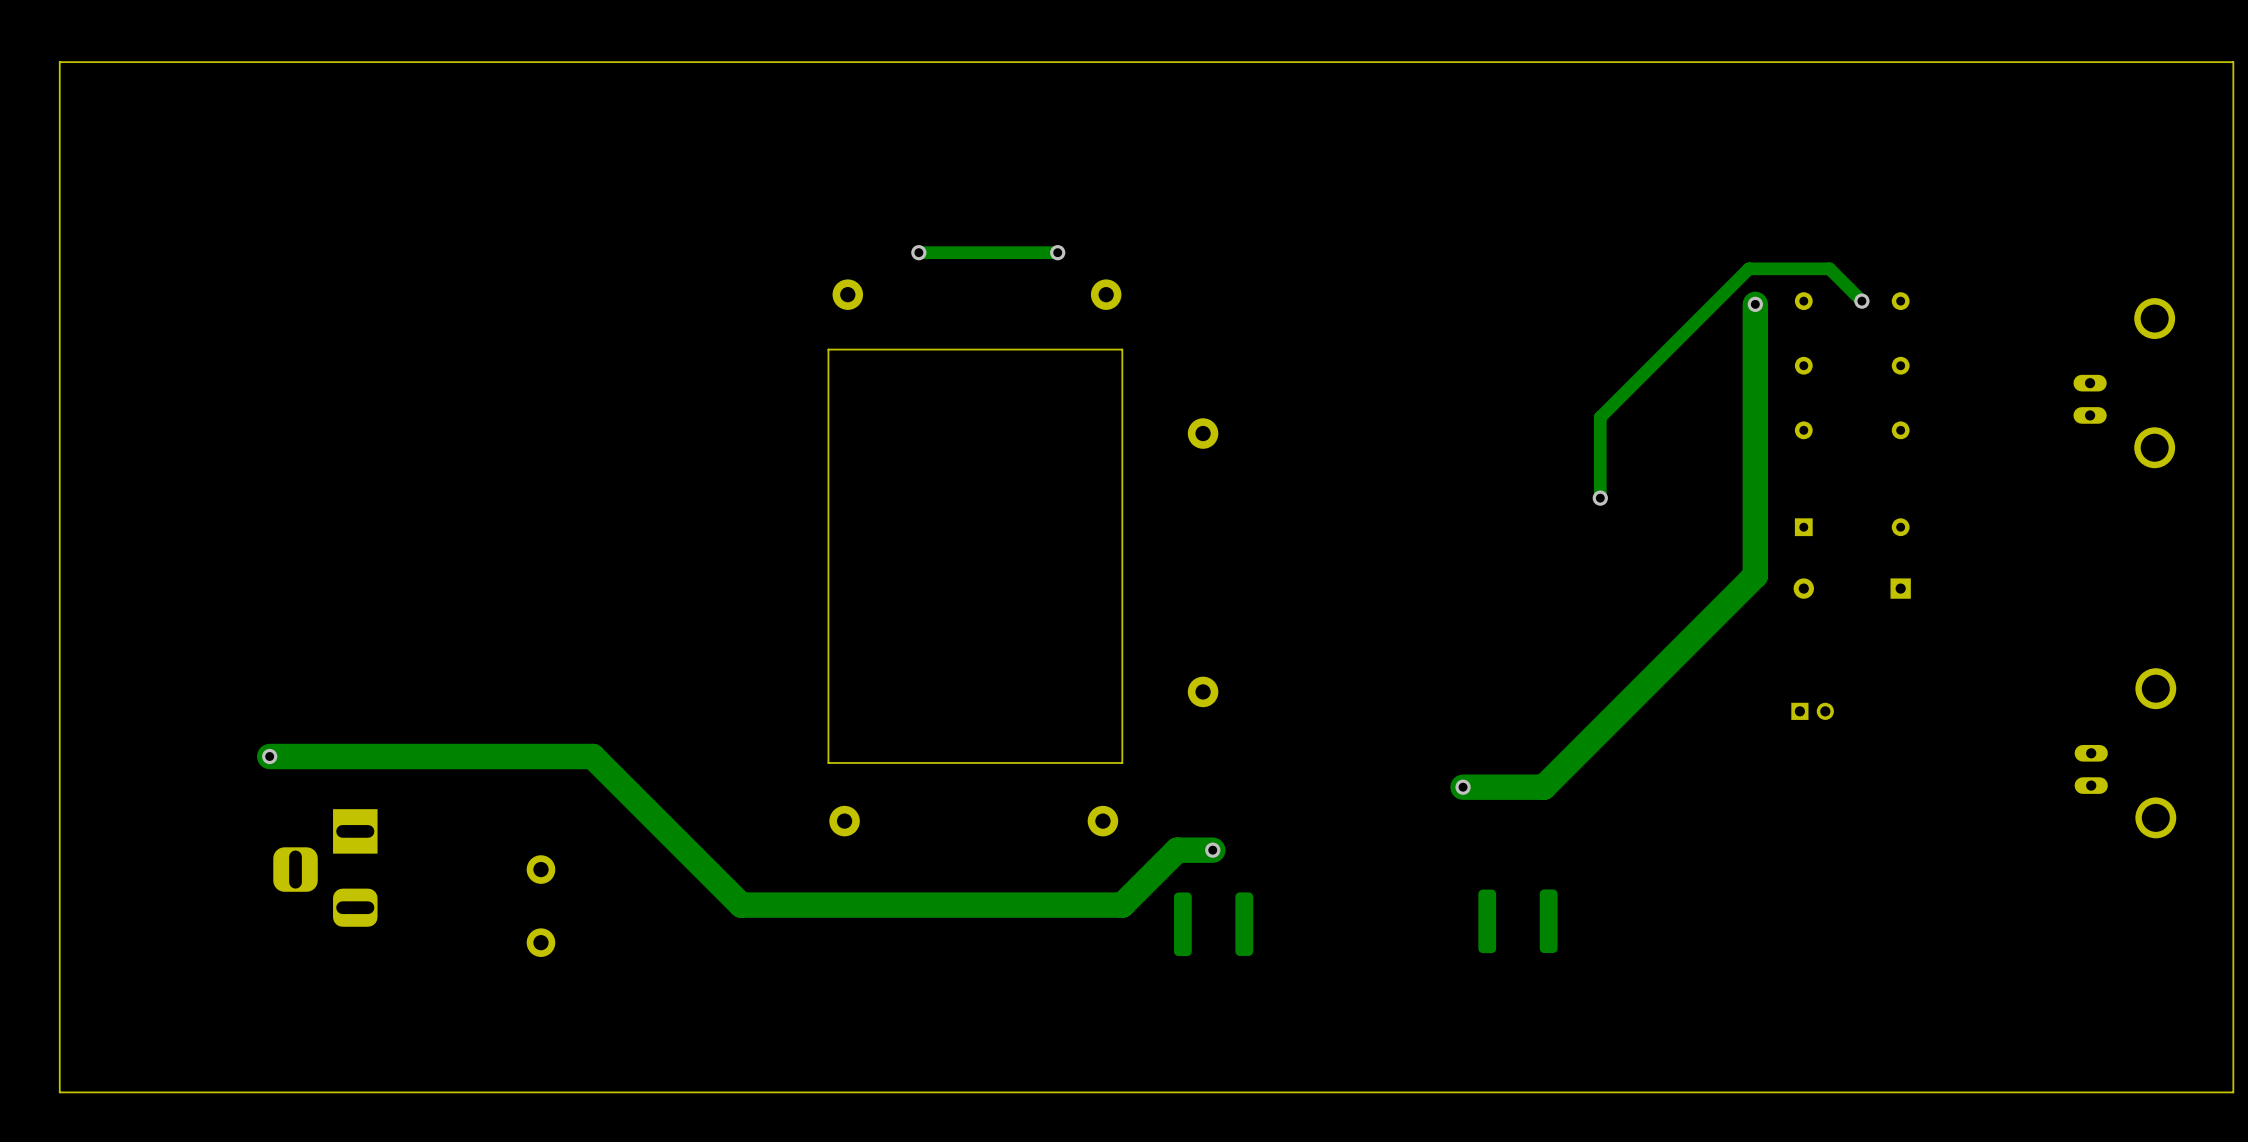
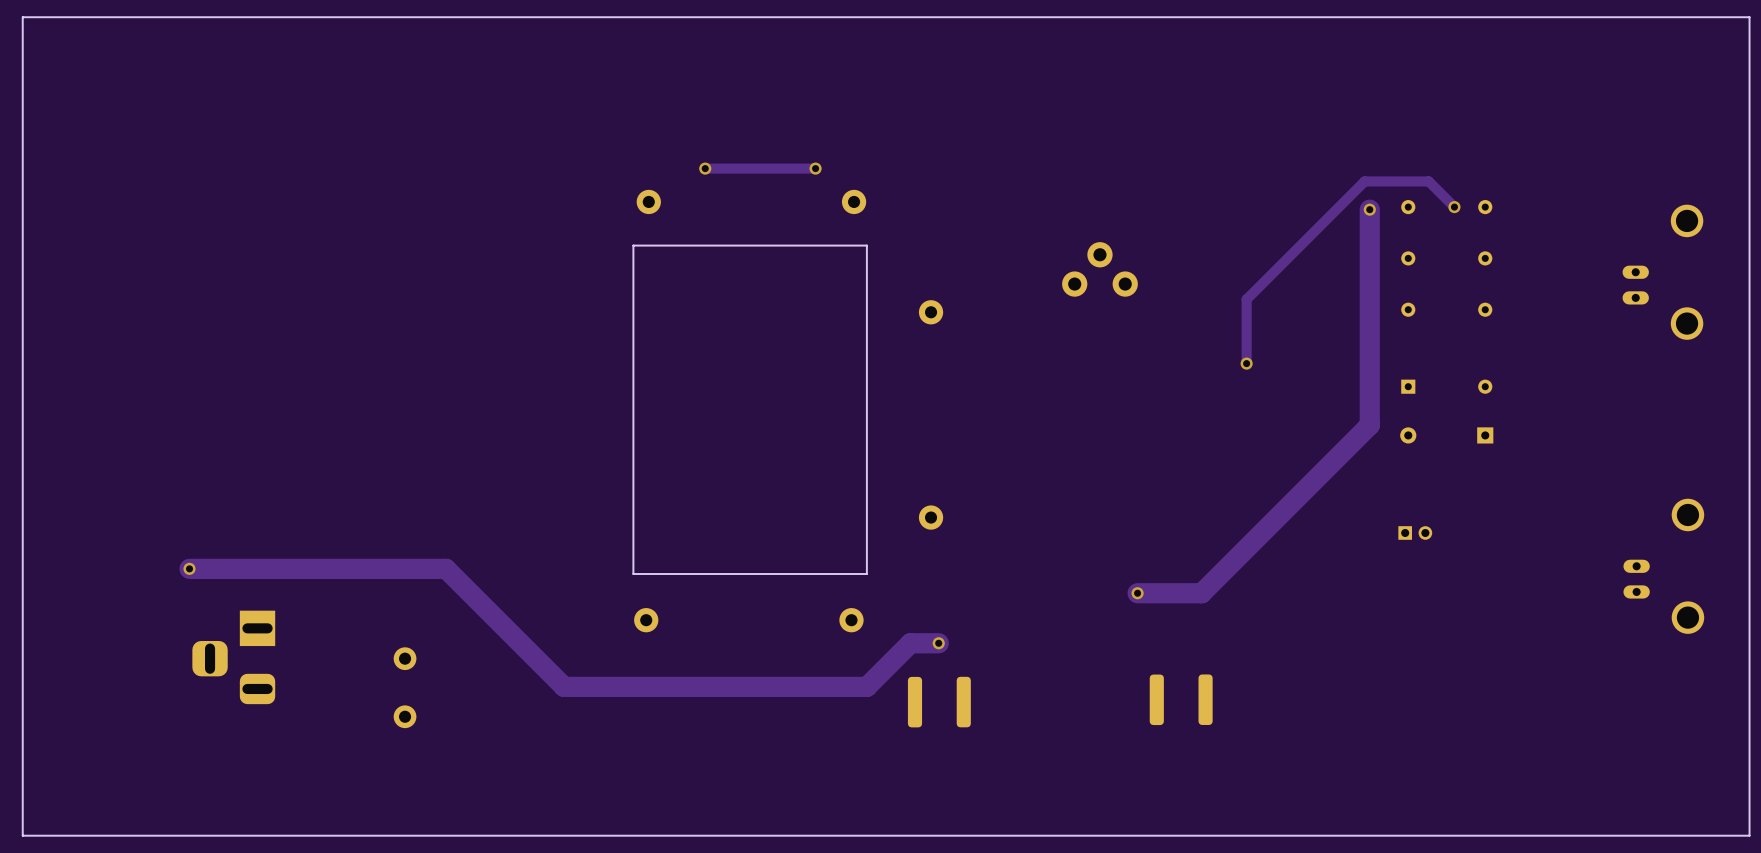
part: none -> (1099, 269)

